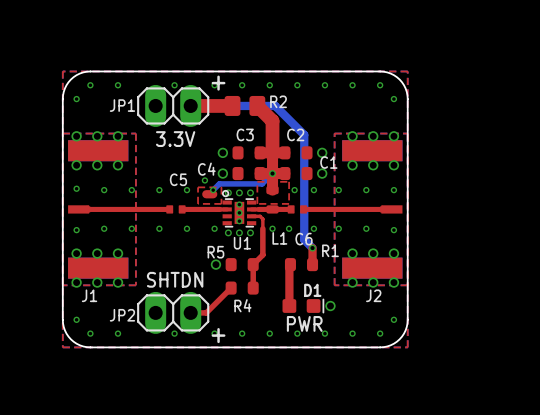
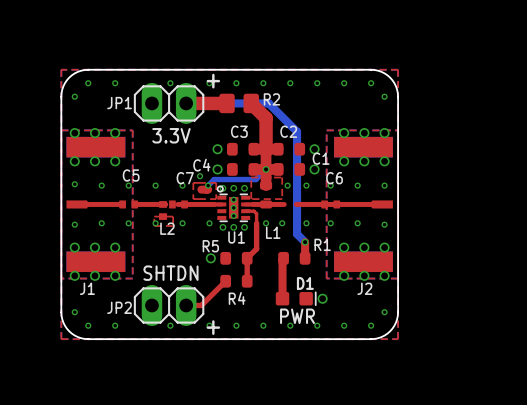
top track: (125, 209) (138, 209) -> none
C5 position: (175, 209) -> (128, 204)
C7: none -> (178, 204)
C6 position: (297, 209) -> (330, 204)
L2: none -> (163, 210)
top zone outline: none -> (154, 216) (173, 216) (173, 226) (154, 226) (154, 216)
C6 name position: C6 (304, 239) -> C6 (334, 178)

